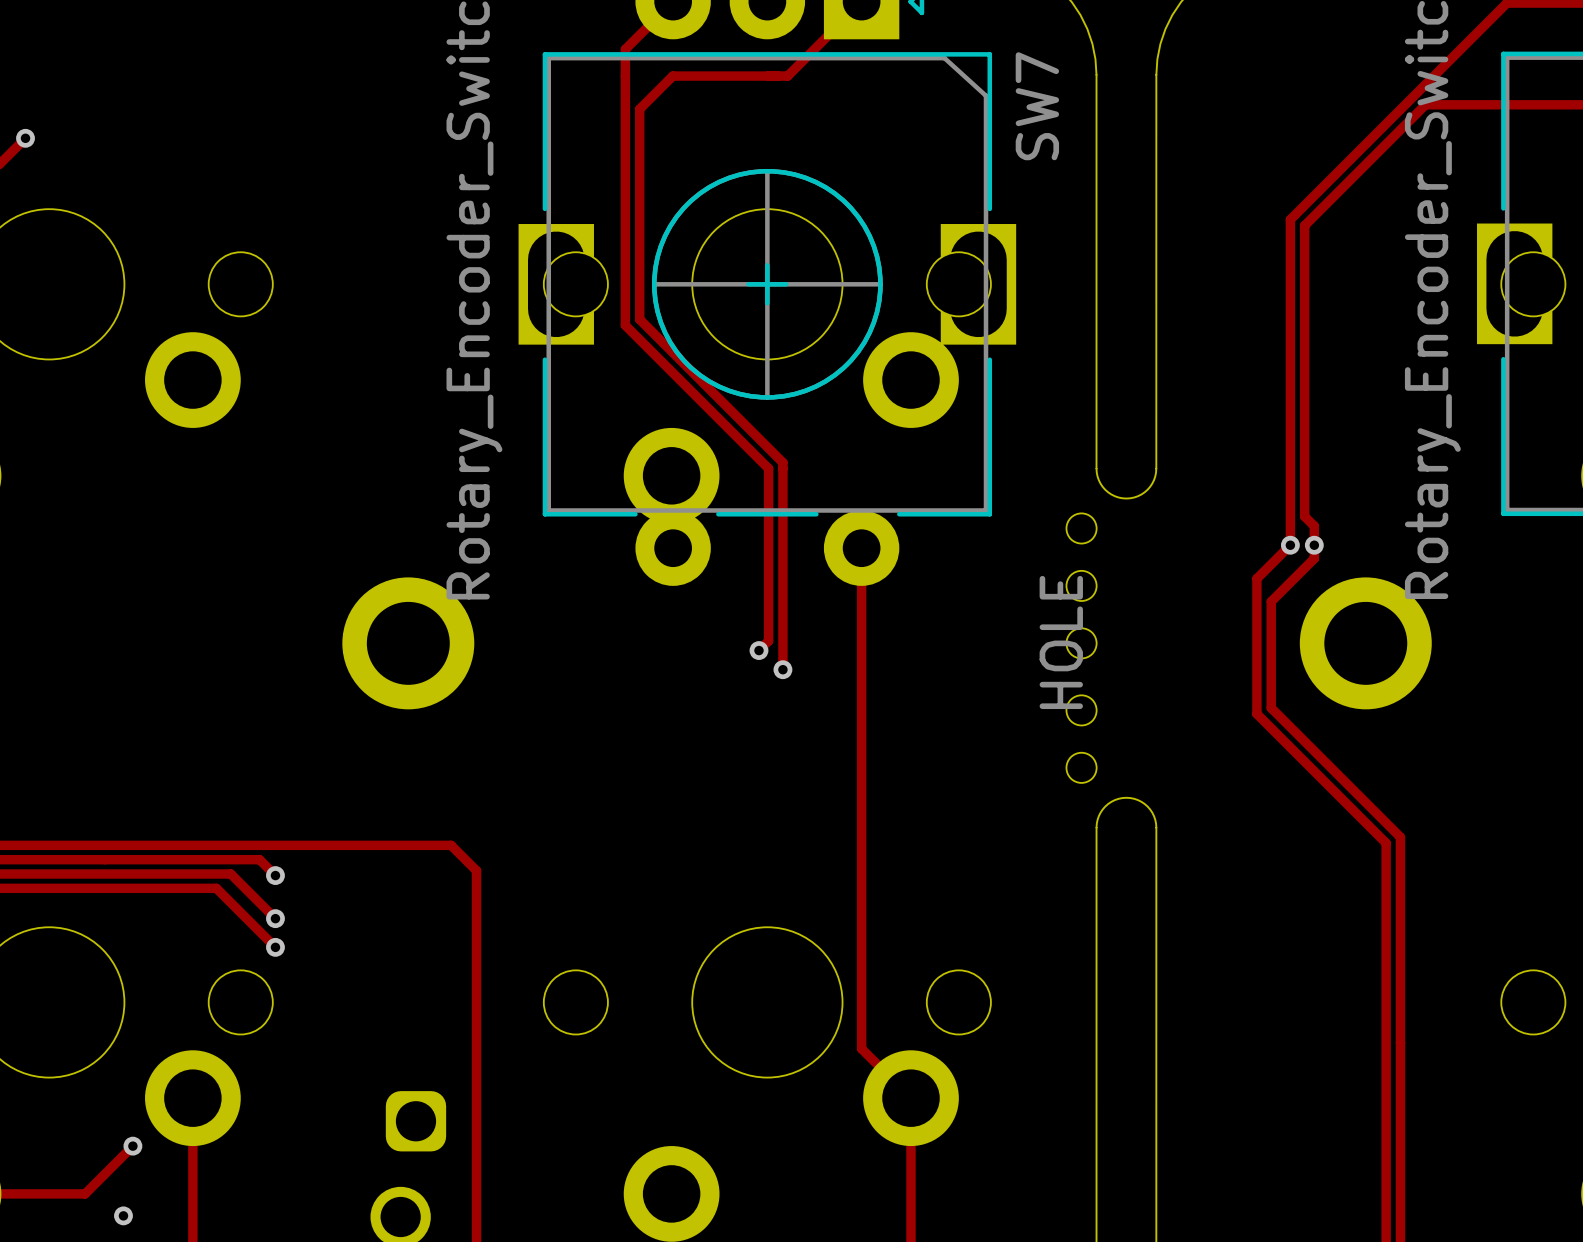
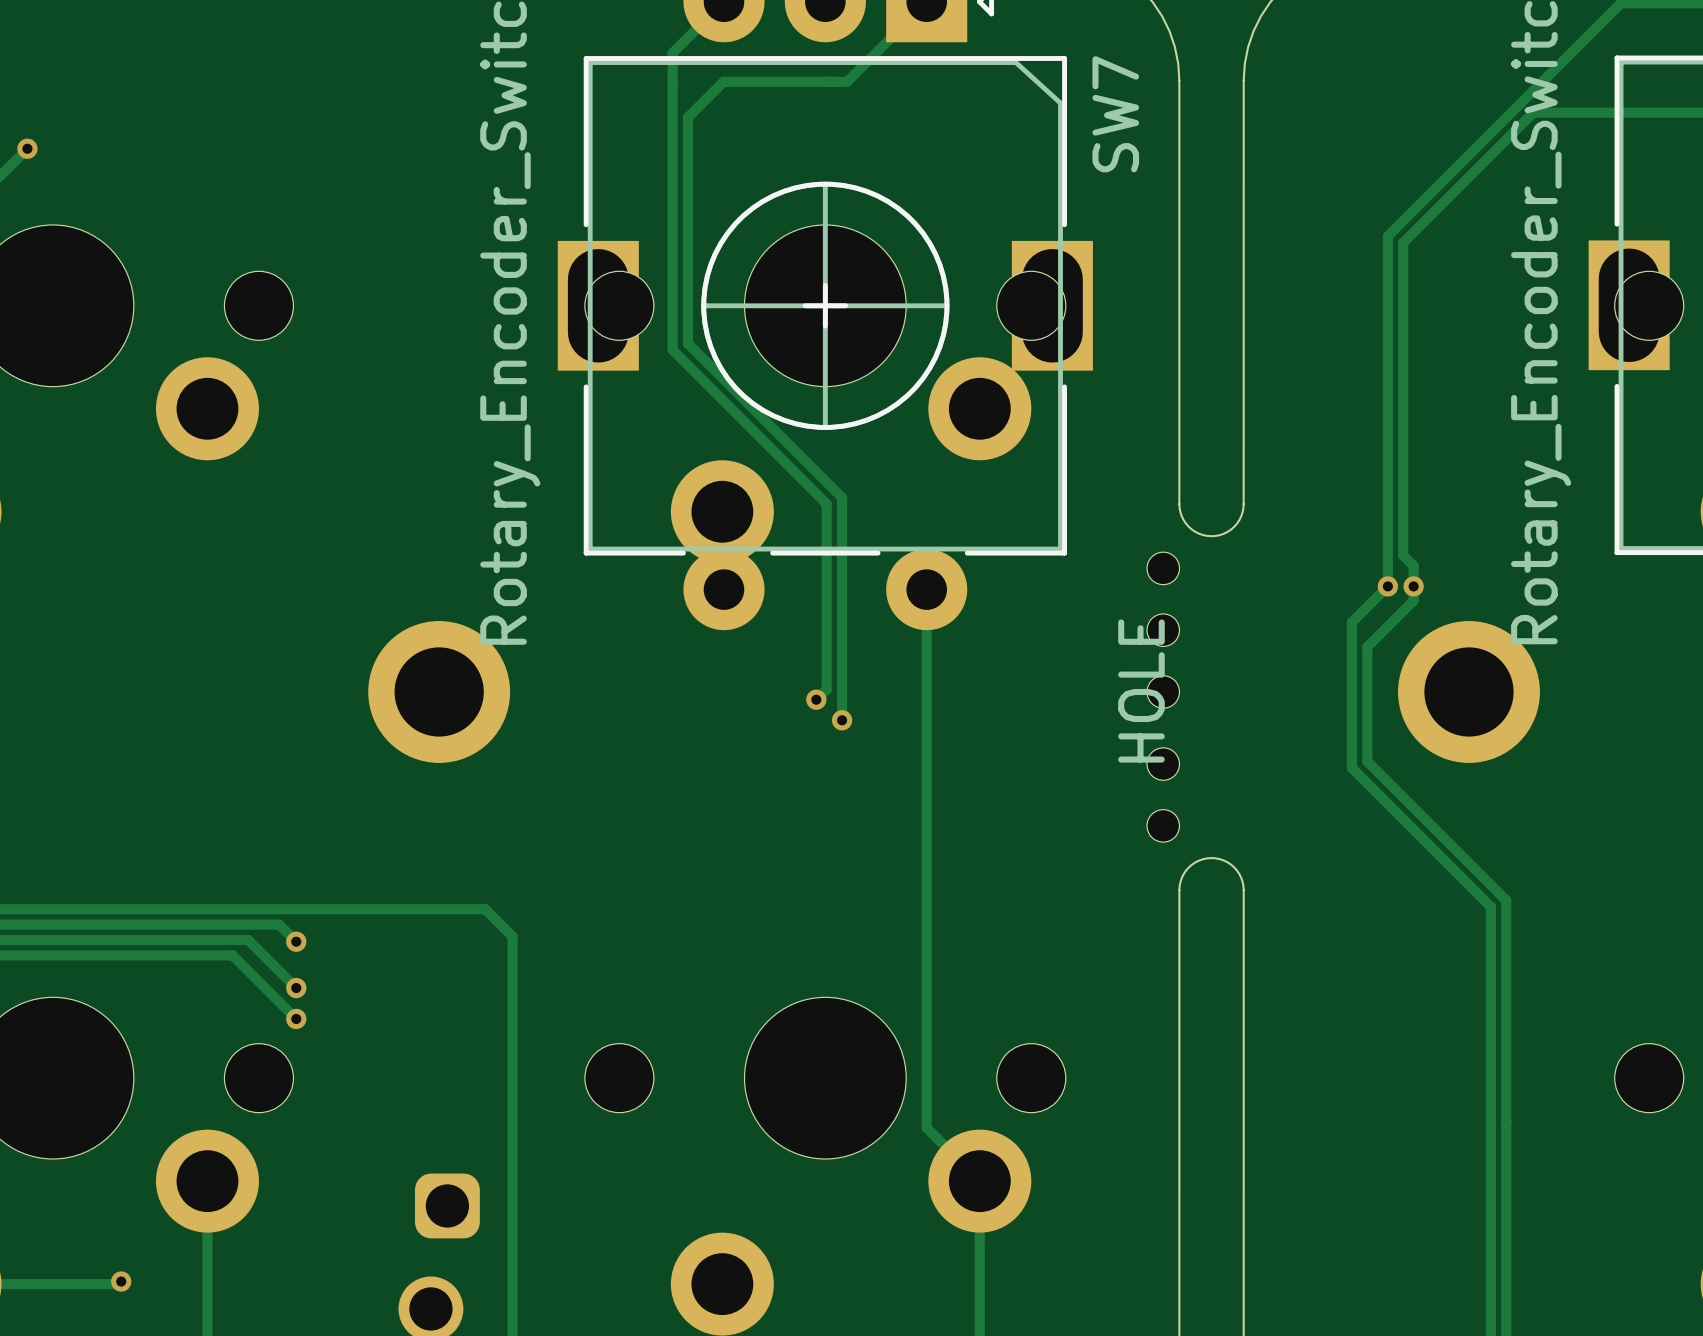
track: (132, 1146) (85, 1193) -> (121, 1281) (118, 1284) (91, 1284)
via: (132, 1146) -> none
via: none -> (121, 1281)
via: (123, 1215) -> none

